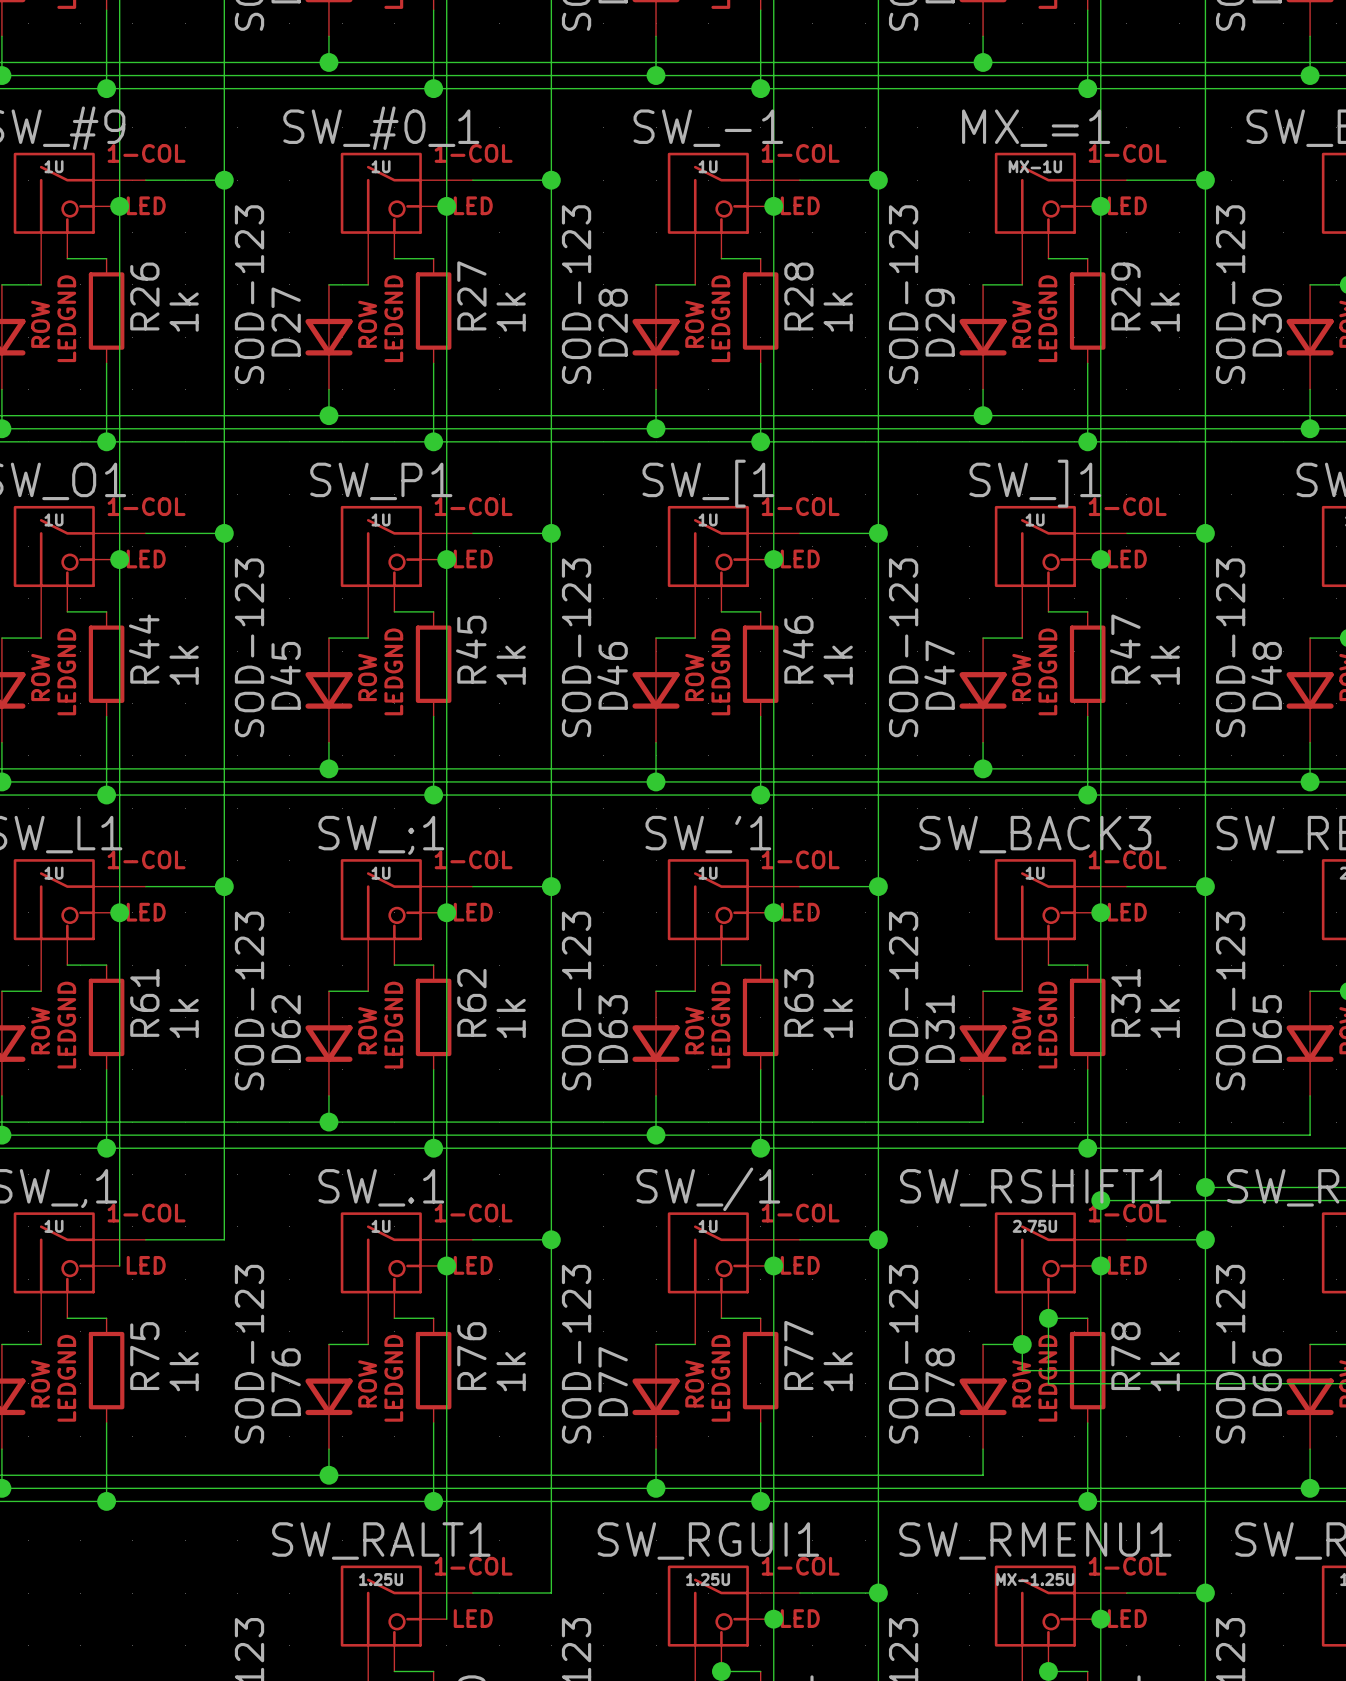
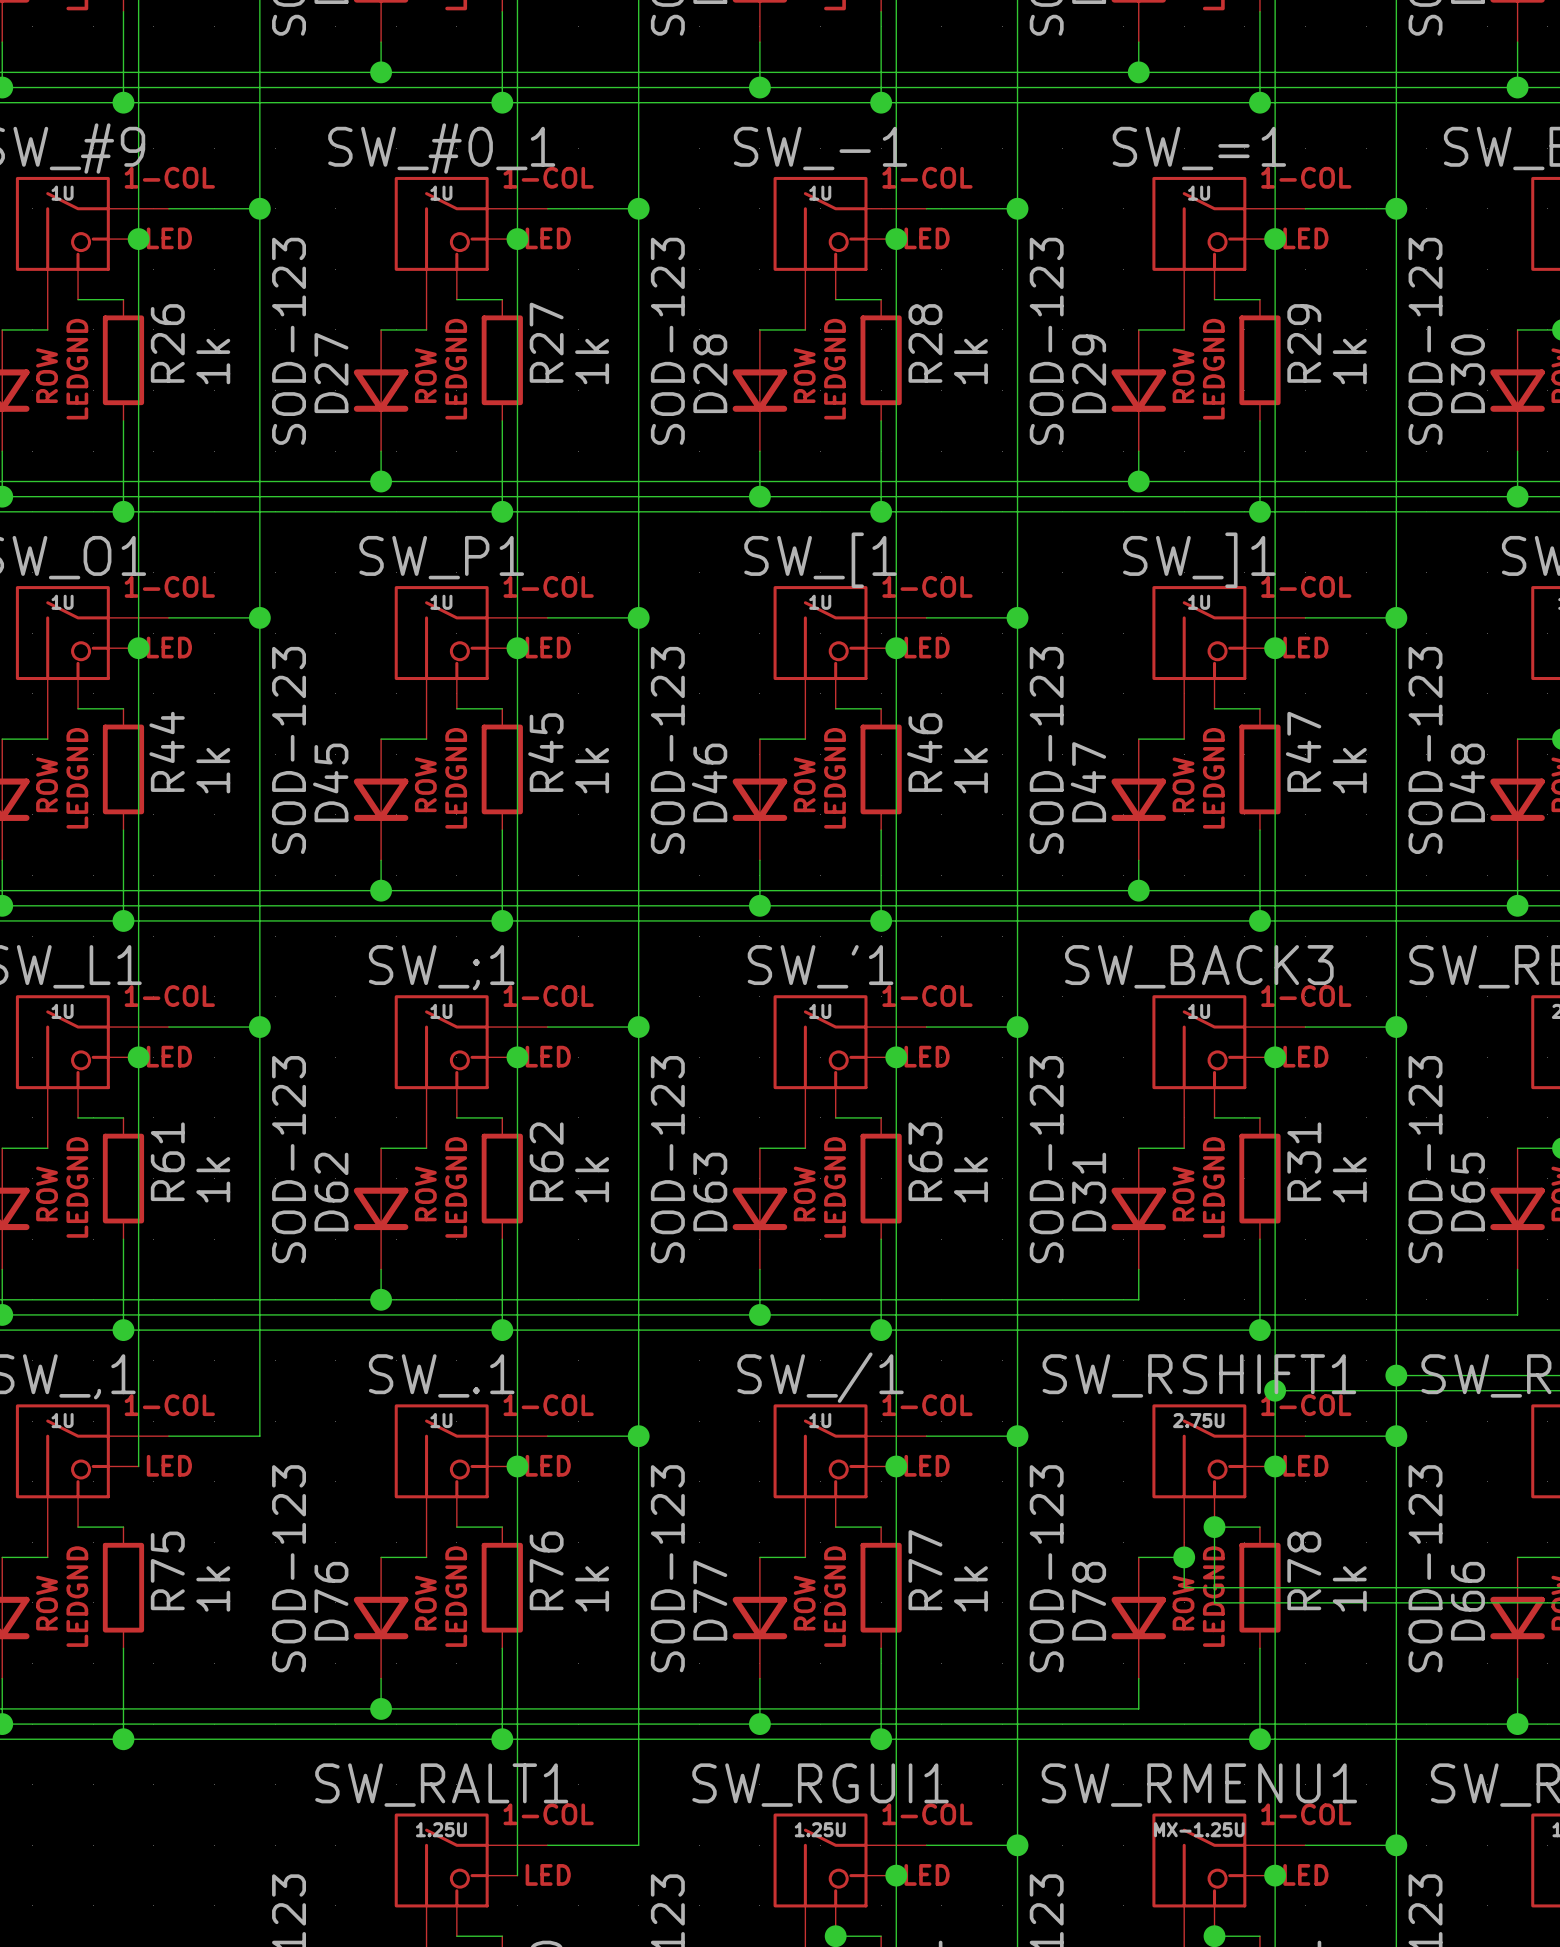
MX_=1 name: MX_=1 (1036, 128) -> SW_=1 (1199, 148)
MX_=1 value: MX-1U (1035, 166) -> 1U (1199, 193)

